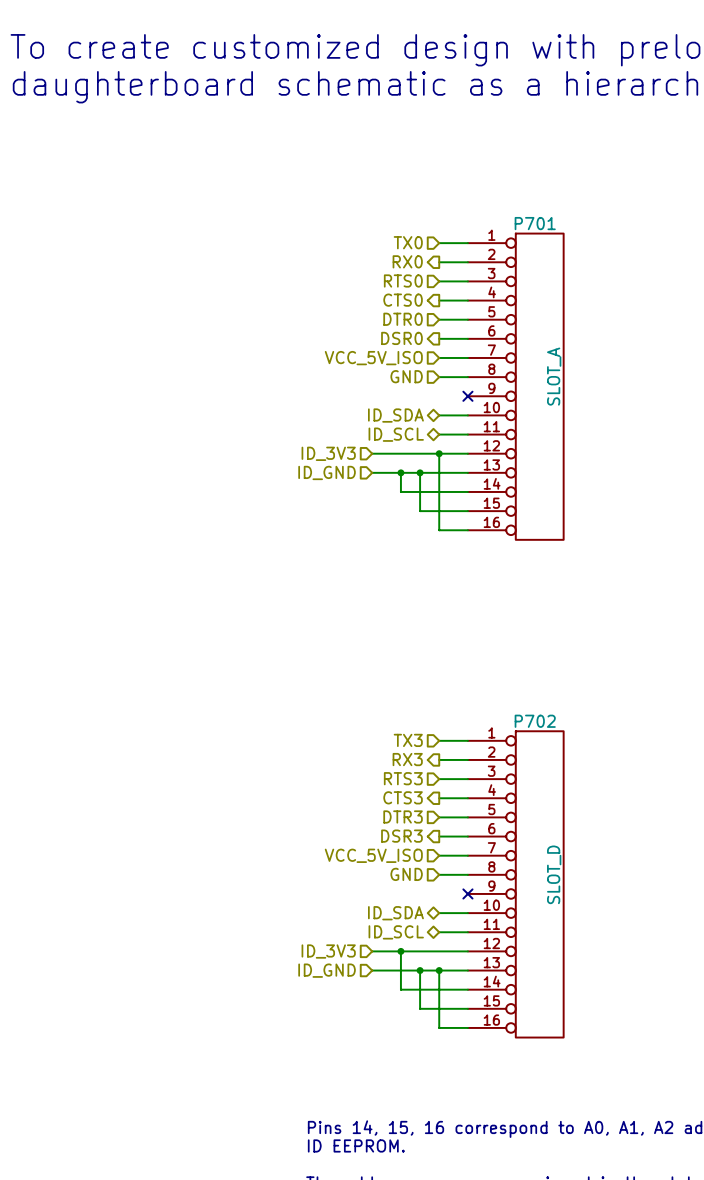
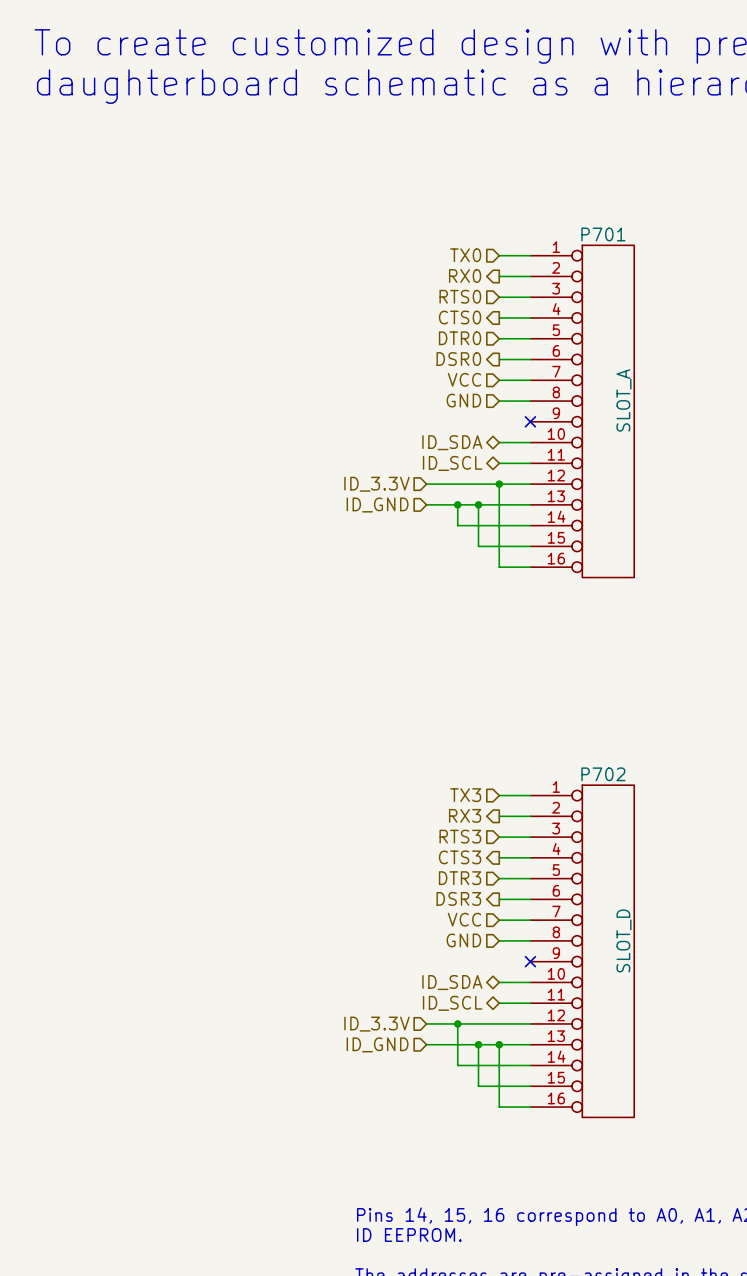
hierarchical label: VCC_5V_ISO (373, 358) -> VCC (464, 379)
hierarchical label: ID_3V3 (328, 453) -> ID_3.3V (376, 484)
hierarchical label: VCC_5V_ISO (373, 855) -> VCC (464, 919)
hierarchical label: ID_3V3 (328, 951) -> ID_3.3V (376, 1024)

